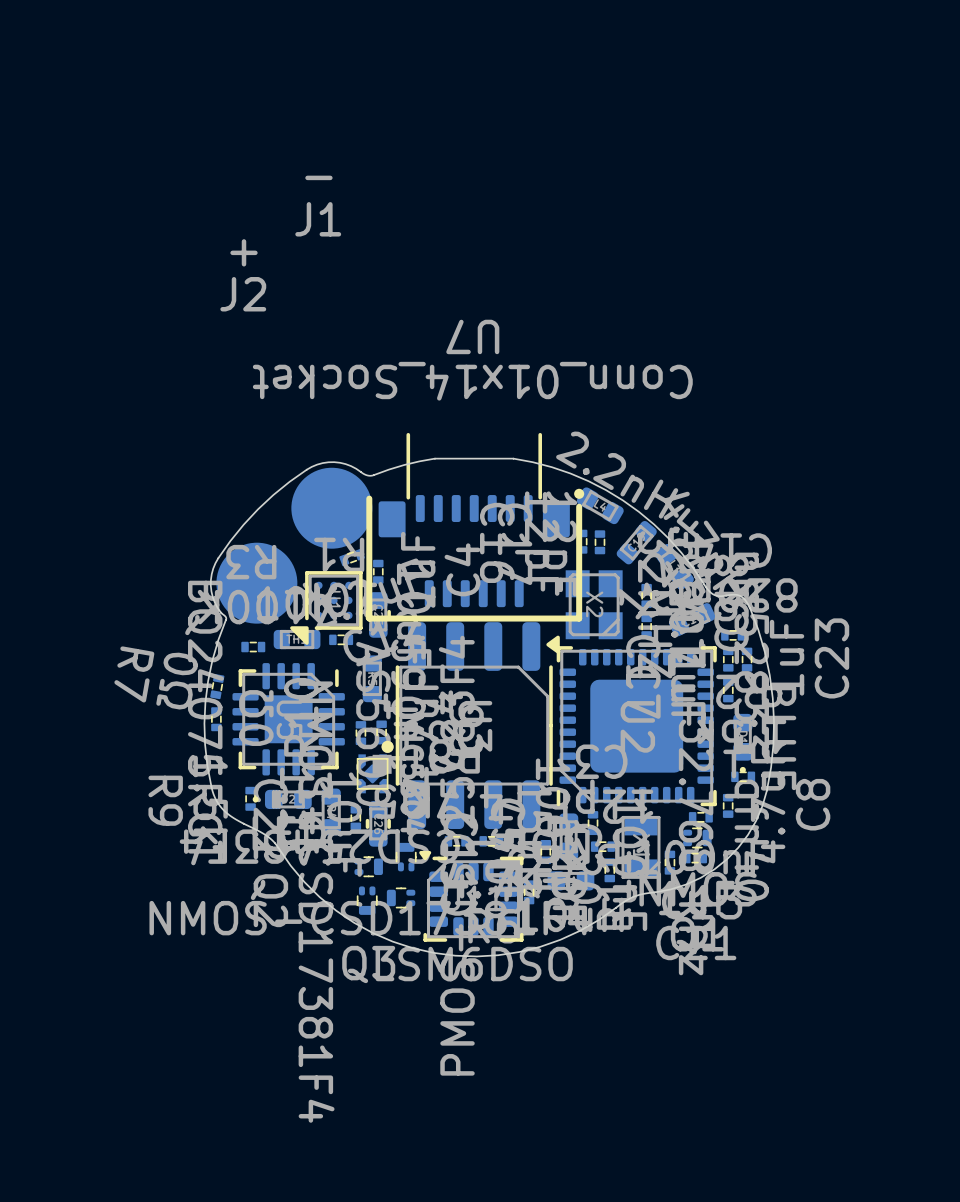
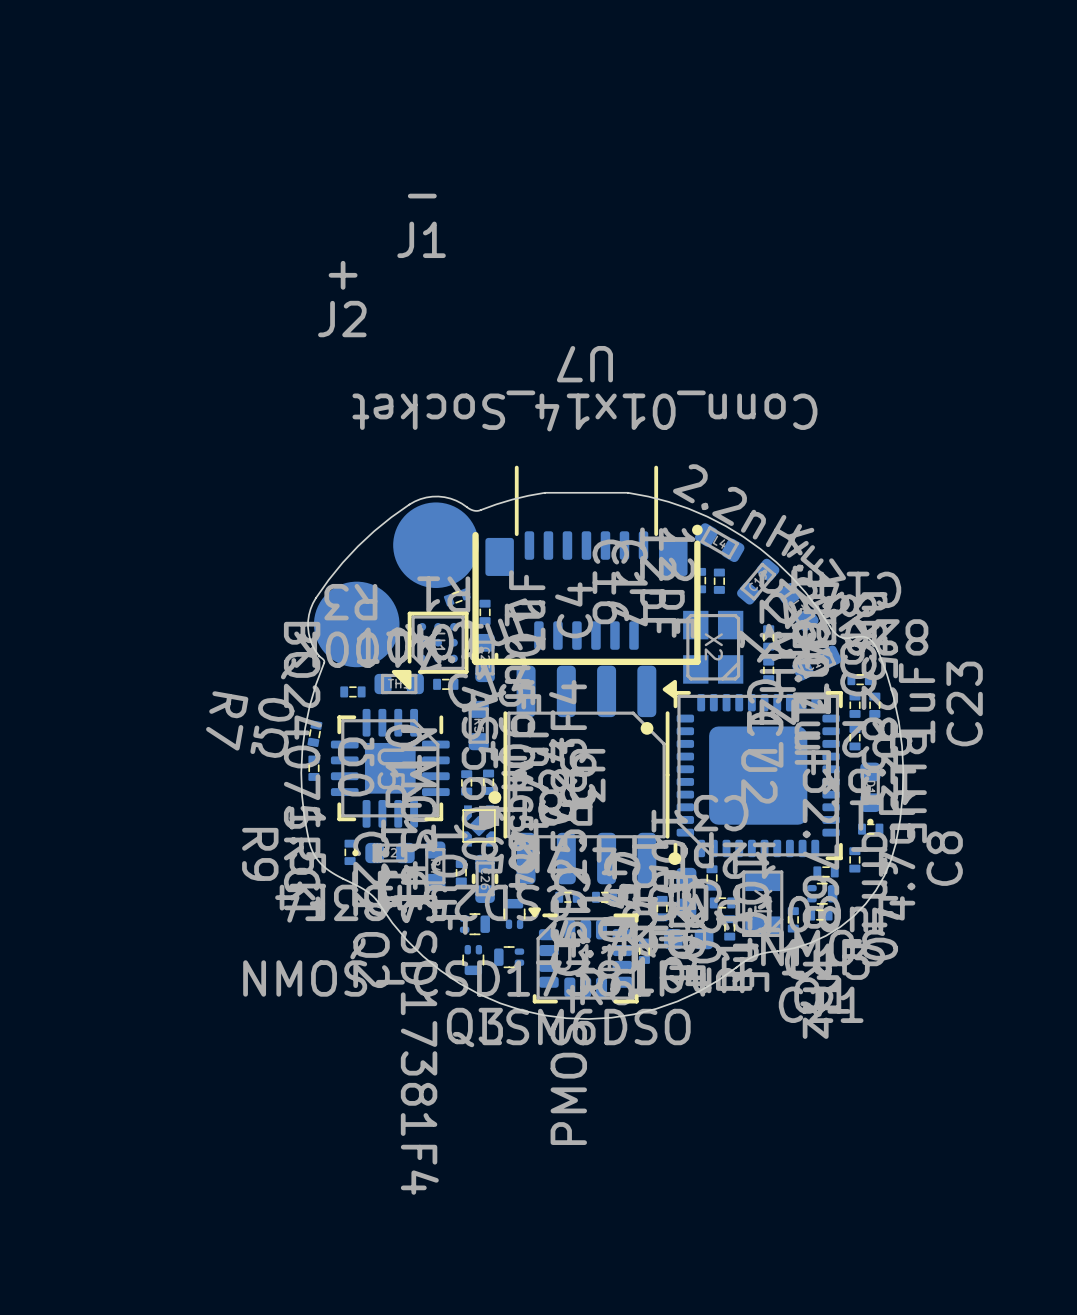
drawing: none -> [640, 721, 654, 735]
drawing: none -> [668, 852, 682, 866]

